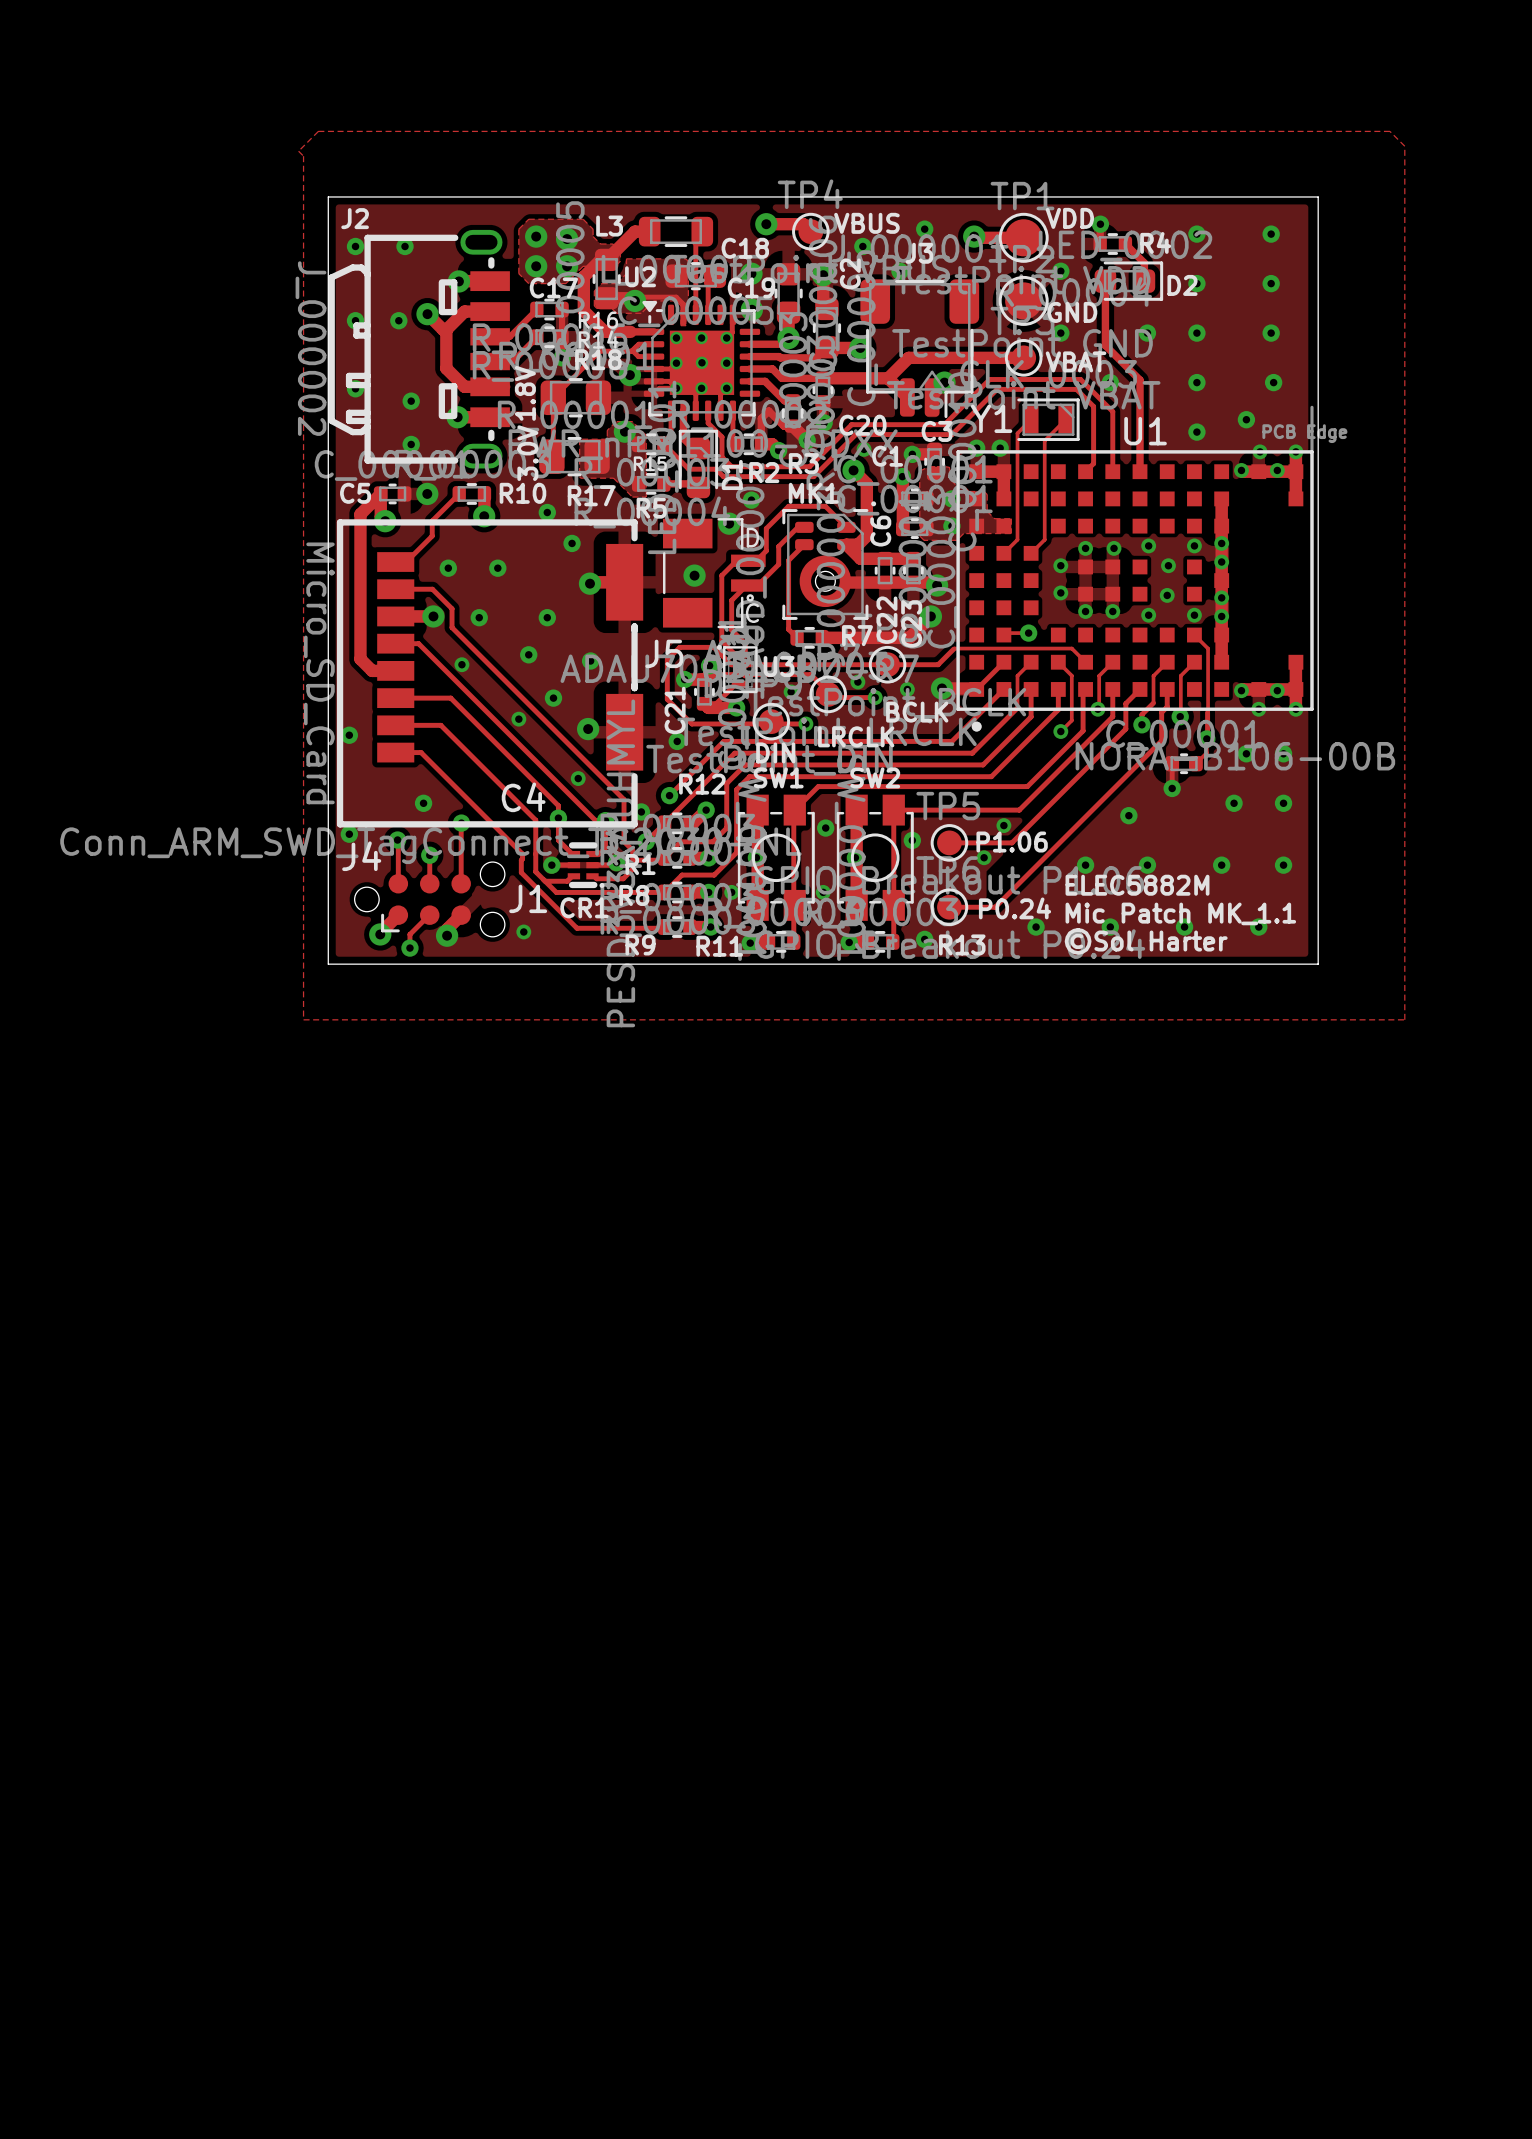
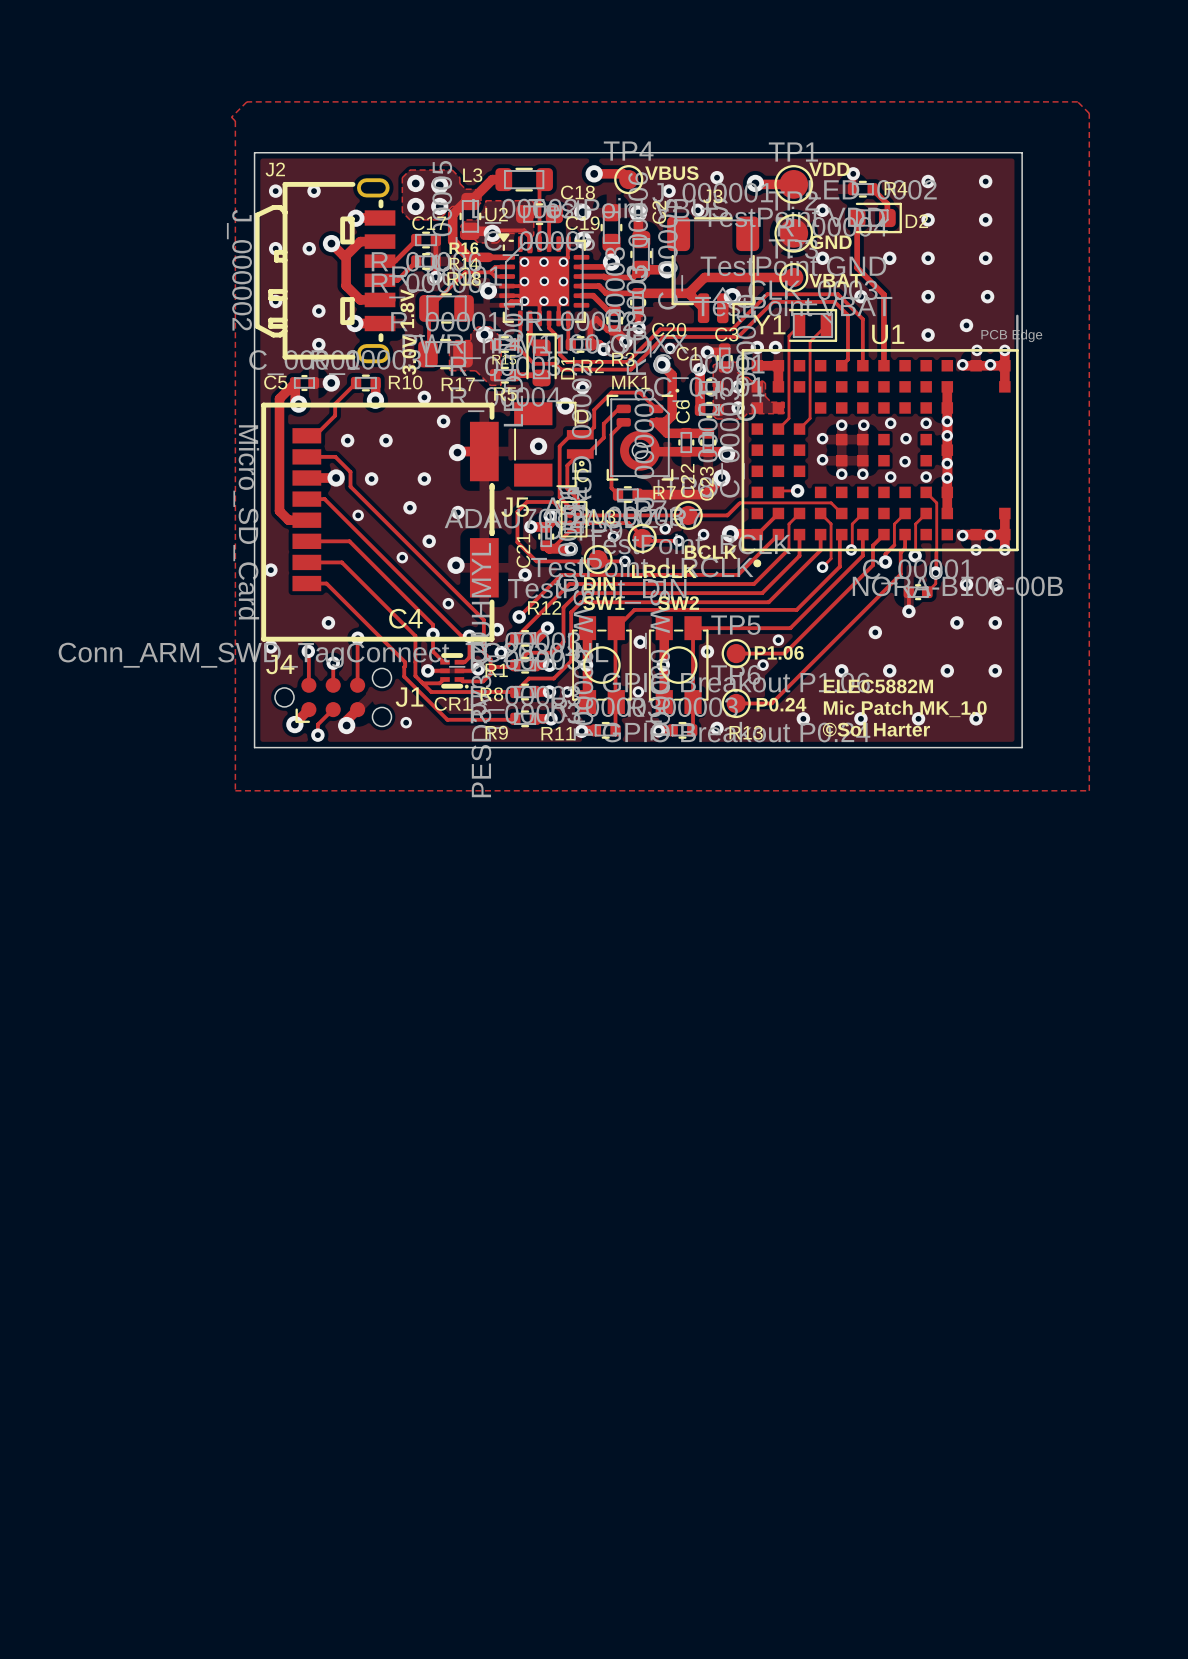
text: Mic Patch MK_1.1 (1180, 913) -> Mic Patch MK_1.0 (905, 708)

